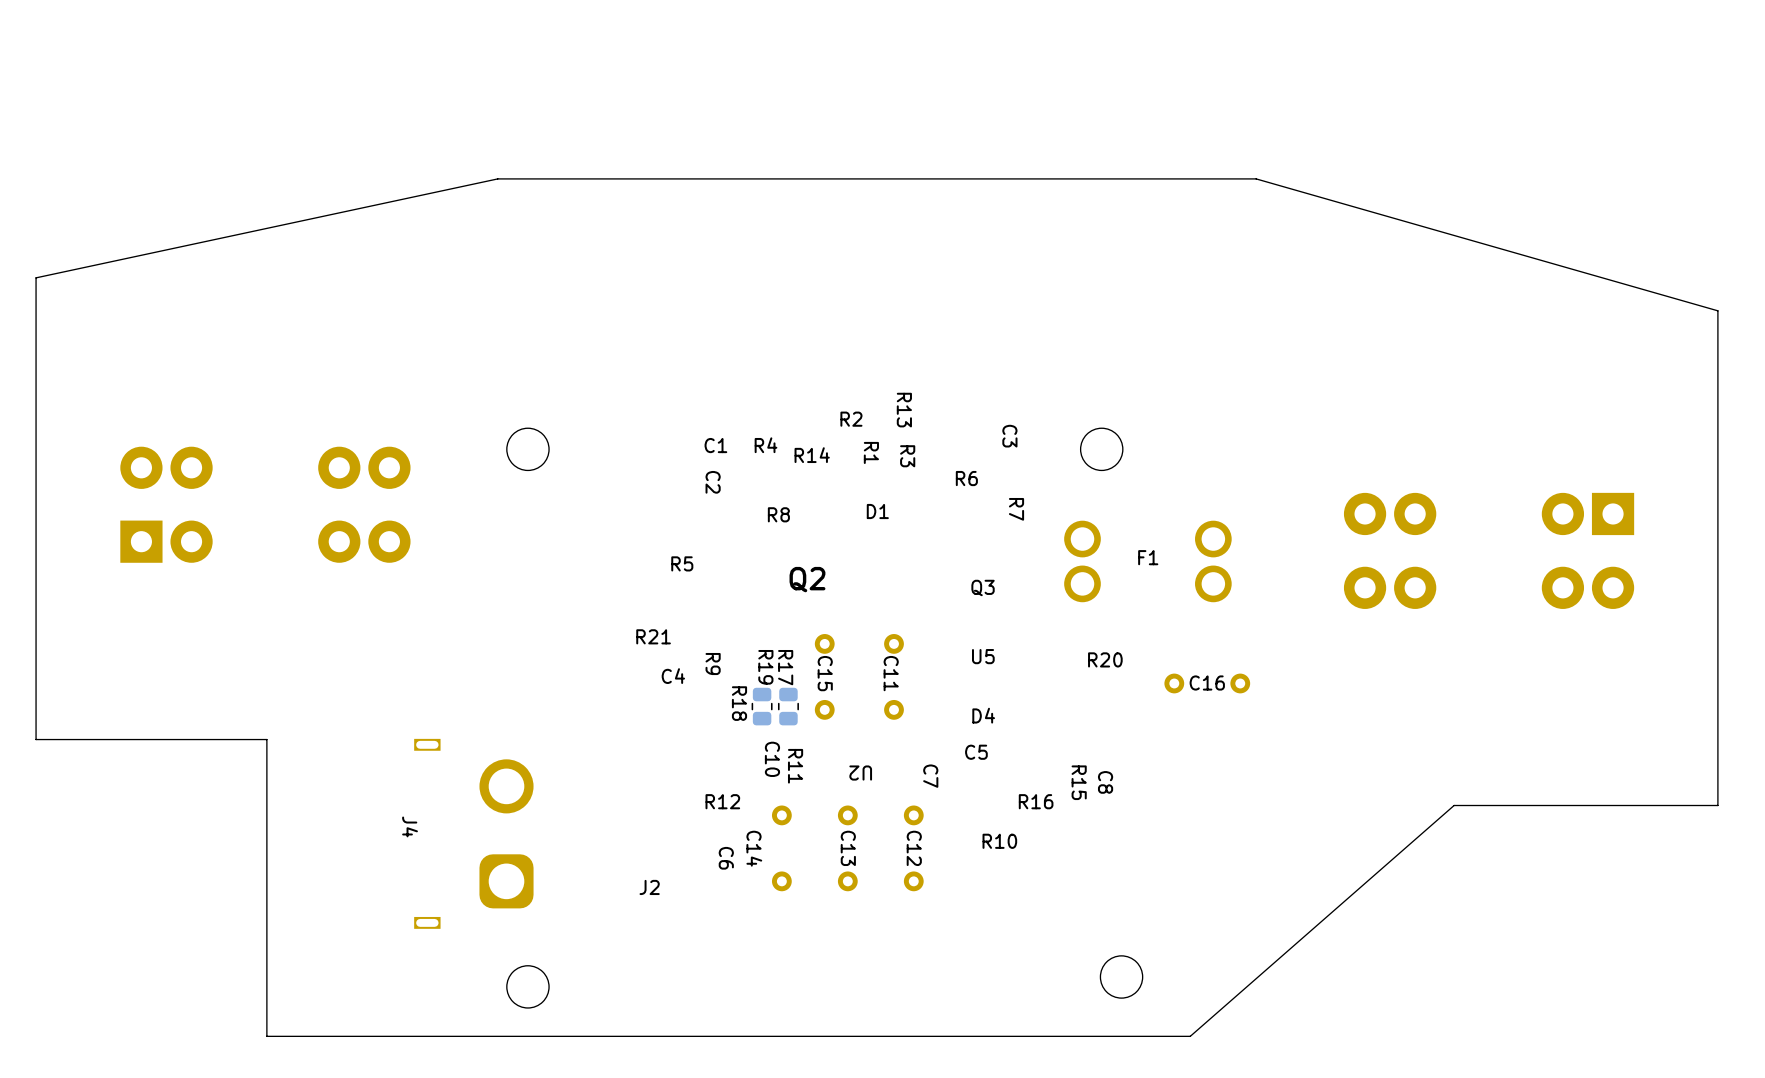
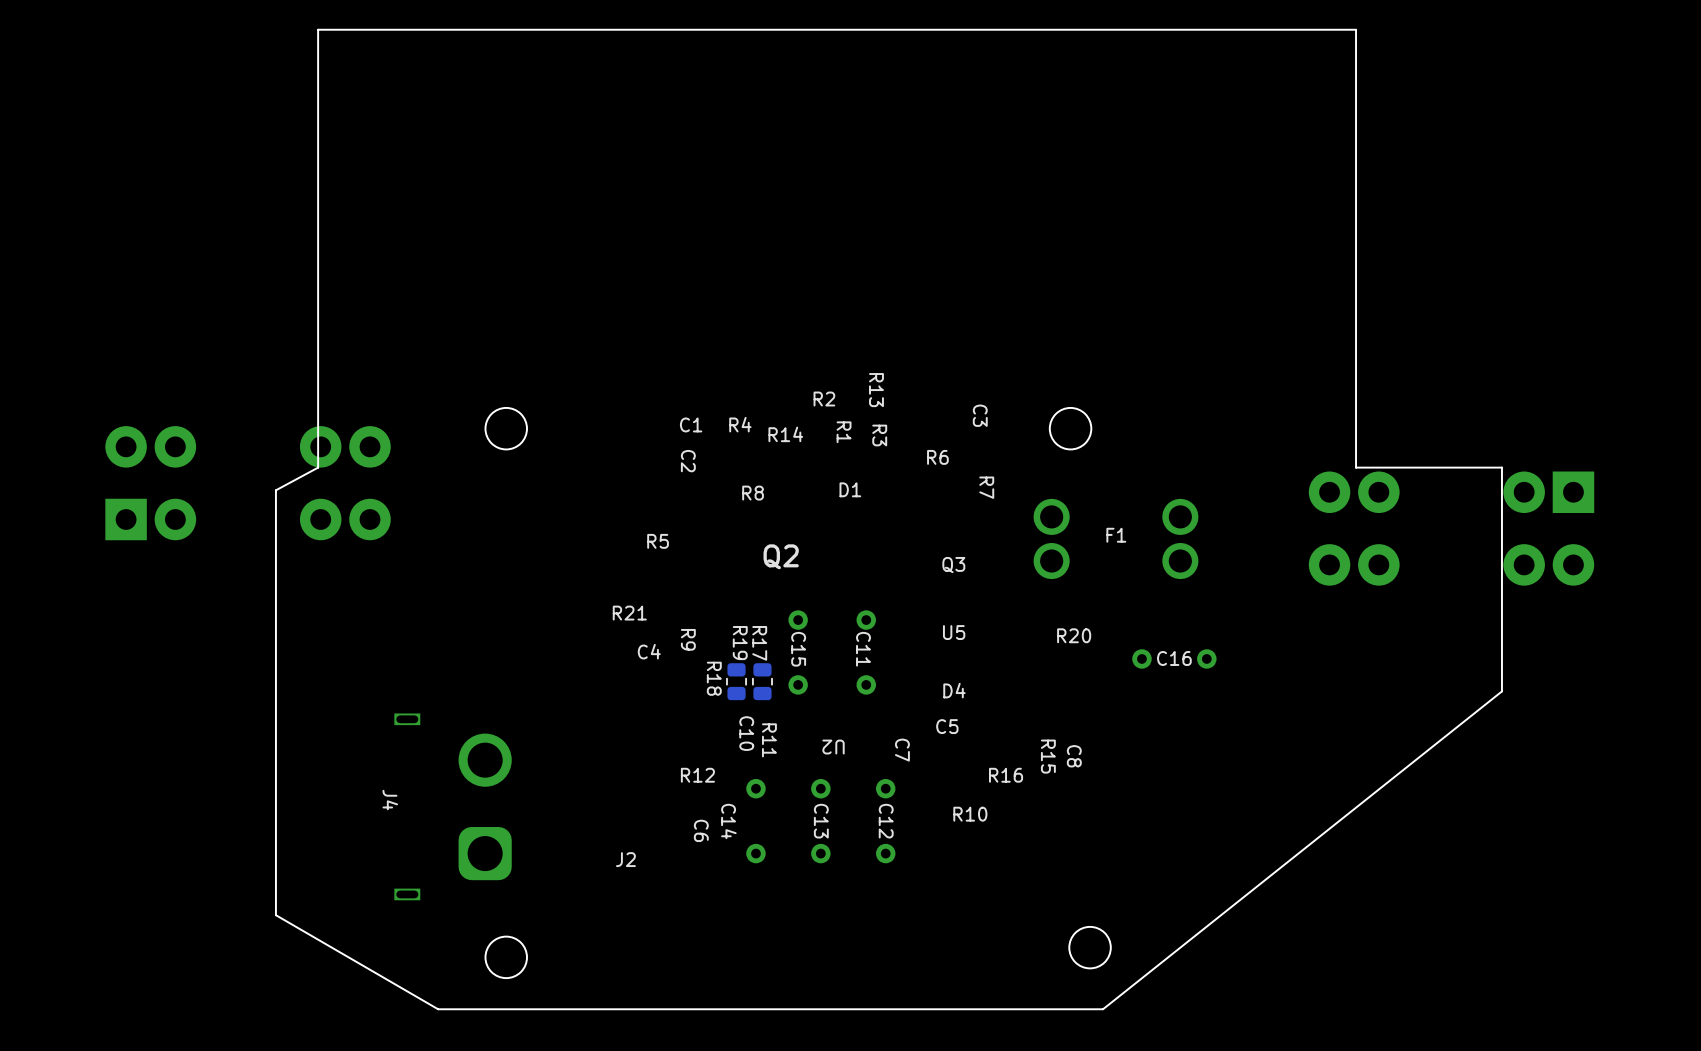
board edge: (1256, 178) (1717, 310) (1717, 805) (1454, 805) (1190, 1036) (266, 1036) (266, 739) (36, 739) (36, 277) (497, 178) (1256, 178) -> (1356, 29) (1356, 467) (1501, 467) (1501, 691) (1103, 1009) (438, 1009) (275, 915) (275, 490) (318, 467) (318, 29) (1356, 29)

